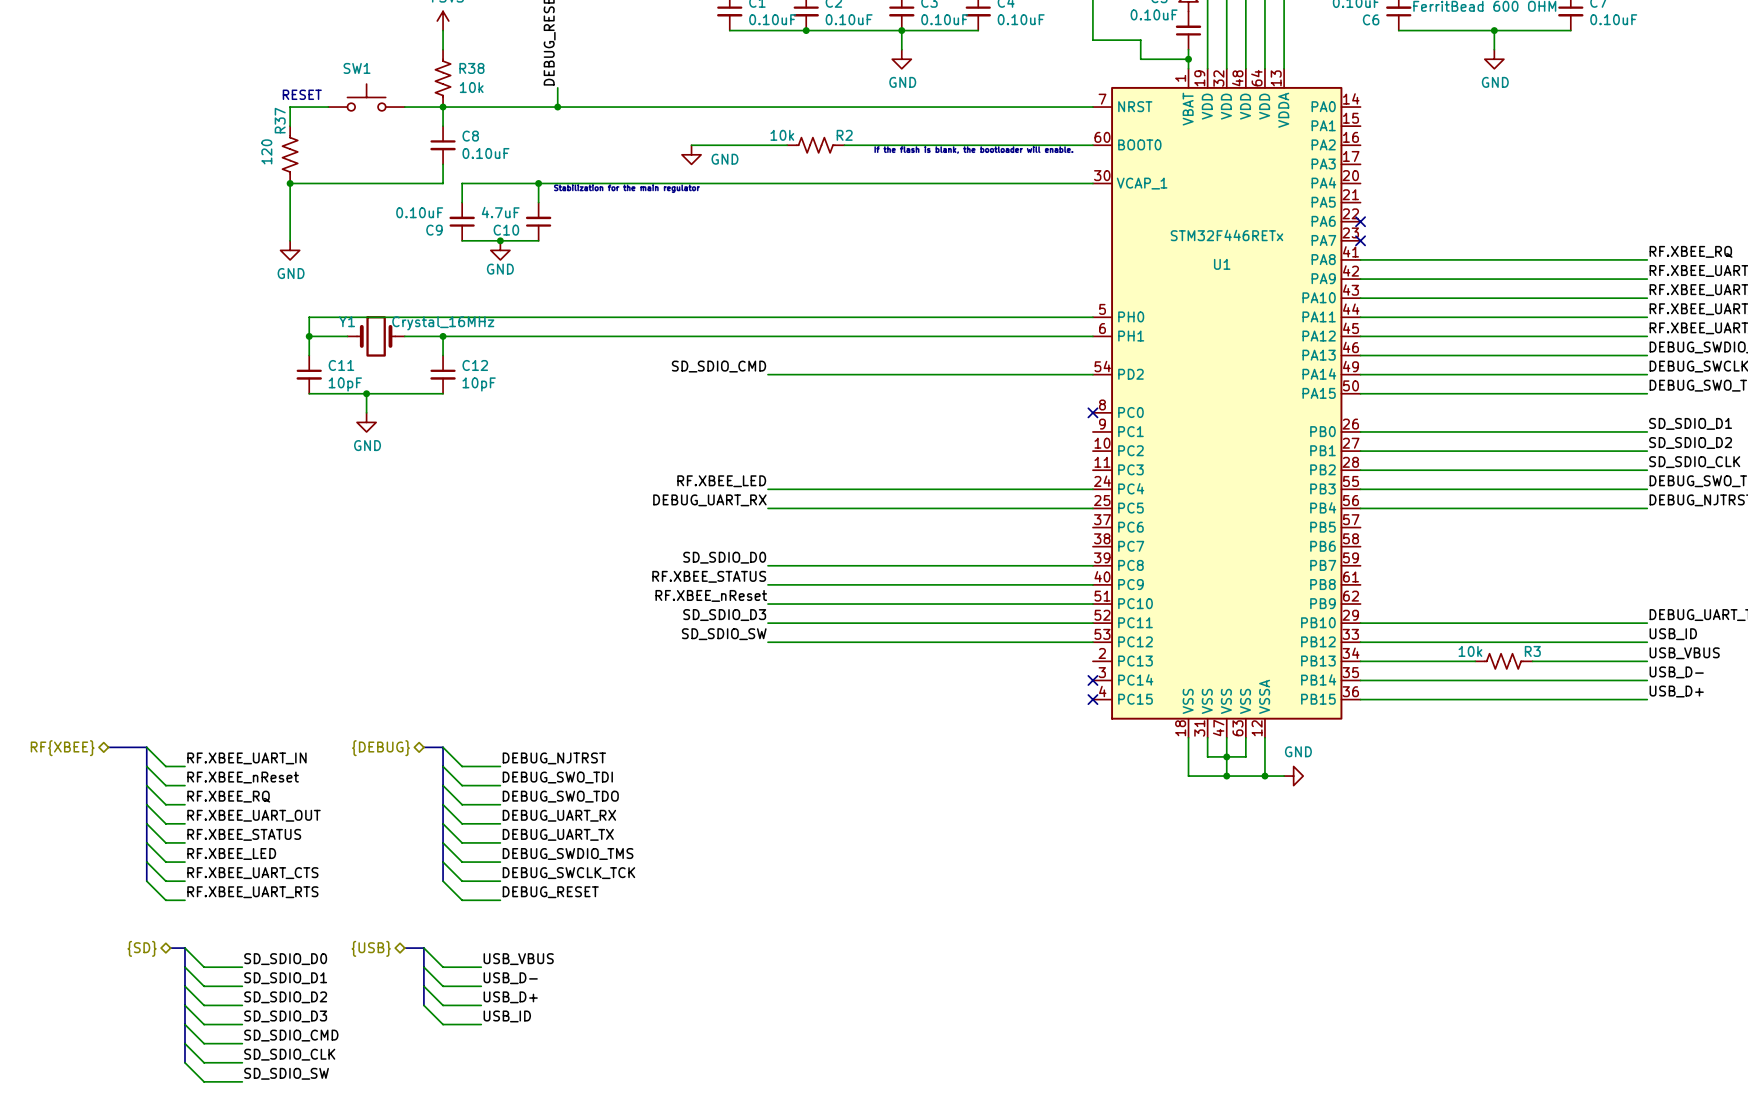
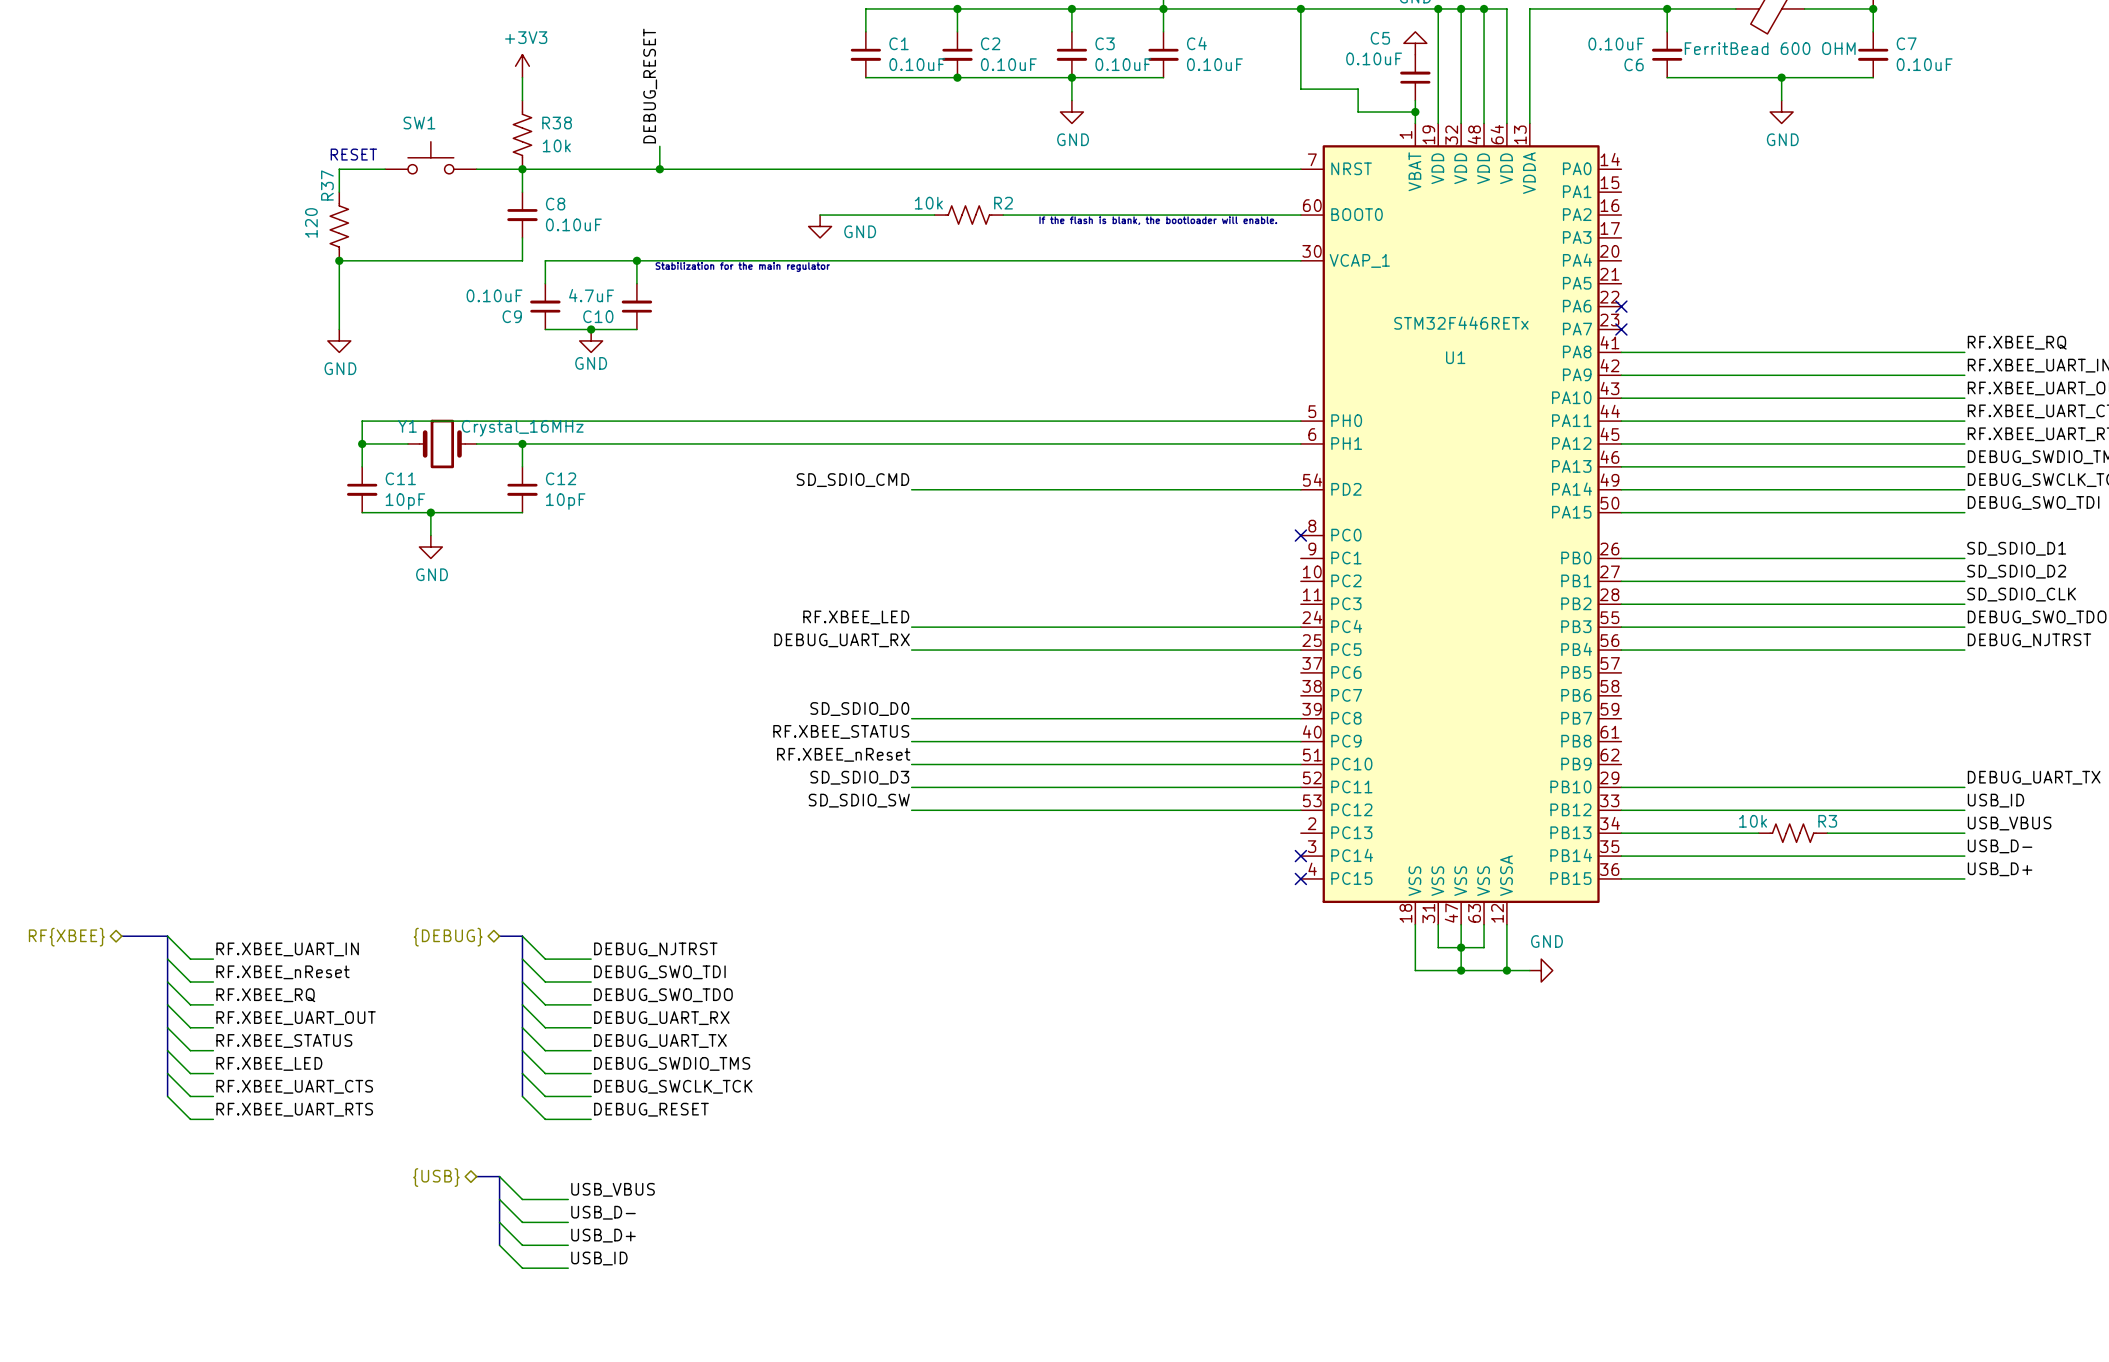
hierarchical label: {SD} (142, 948) -> none
bus: (170, 948) (184, 948) (184, 1062) -> none
wire: (184, 948) (204, 967) (242, 967) -> none
label: SD_SDIO_D0 (285, 959) -> none
wire: (184, 967) (204, 986) (242, 986) -> none
label: SD_SDIO_D1 (285, 978) -> none
wire: (184, 986) (204, 1005) (242, 1005) -> none
label: SD_SDIO_D2 (285, 997) -> none
wire: (184, 1005) (204, 1024) (242, 1024) -> none
label: SD_SDIO_D3 (285, 1016) -> none
wire: (184, 1024) (204, 1043) (242, 1043) -> none
label: SD_SDIO_CMD (291, 1035) -> none
wire: (184, 1043) (204, 1062) (242, 1062) -> none
label: SD_SDIO_CLK (289, 1054) -> none
wire: (184, 1062) (204, 1081) (242, 1081) -> none
label: SD_SDIO_SW (286, 1073) -> none

